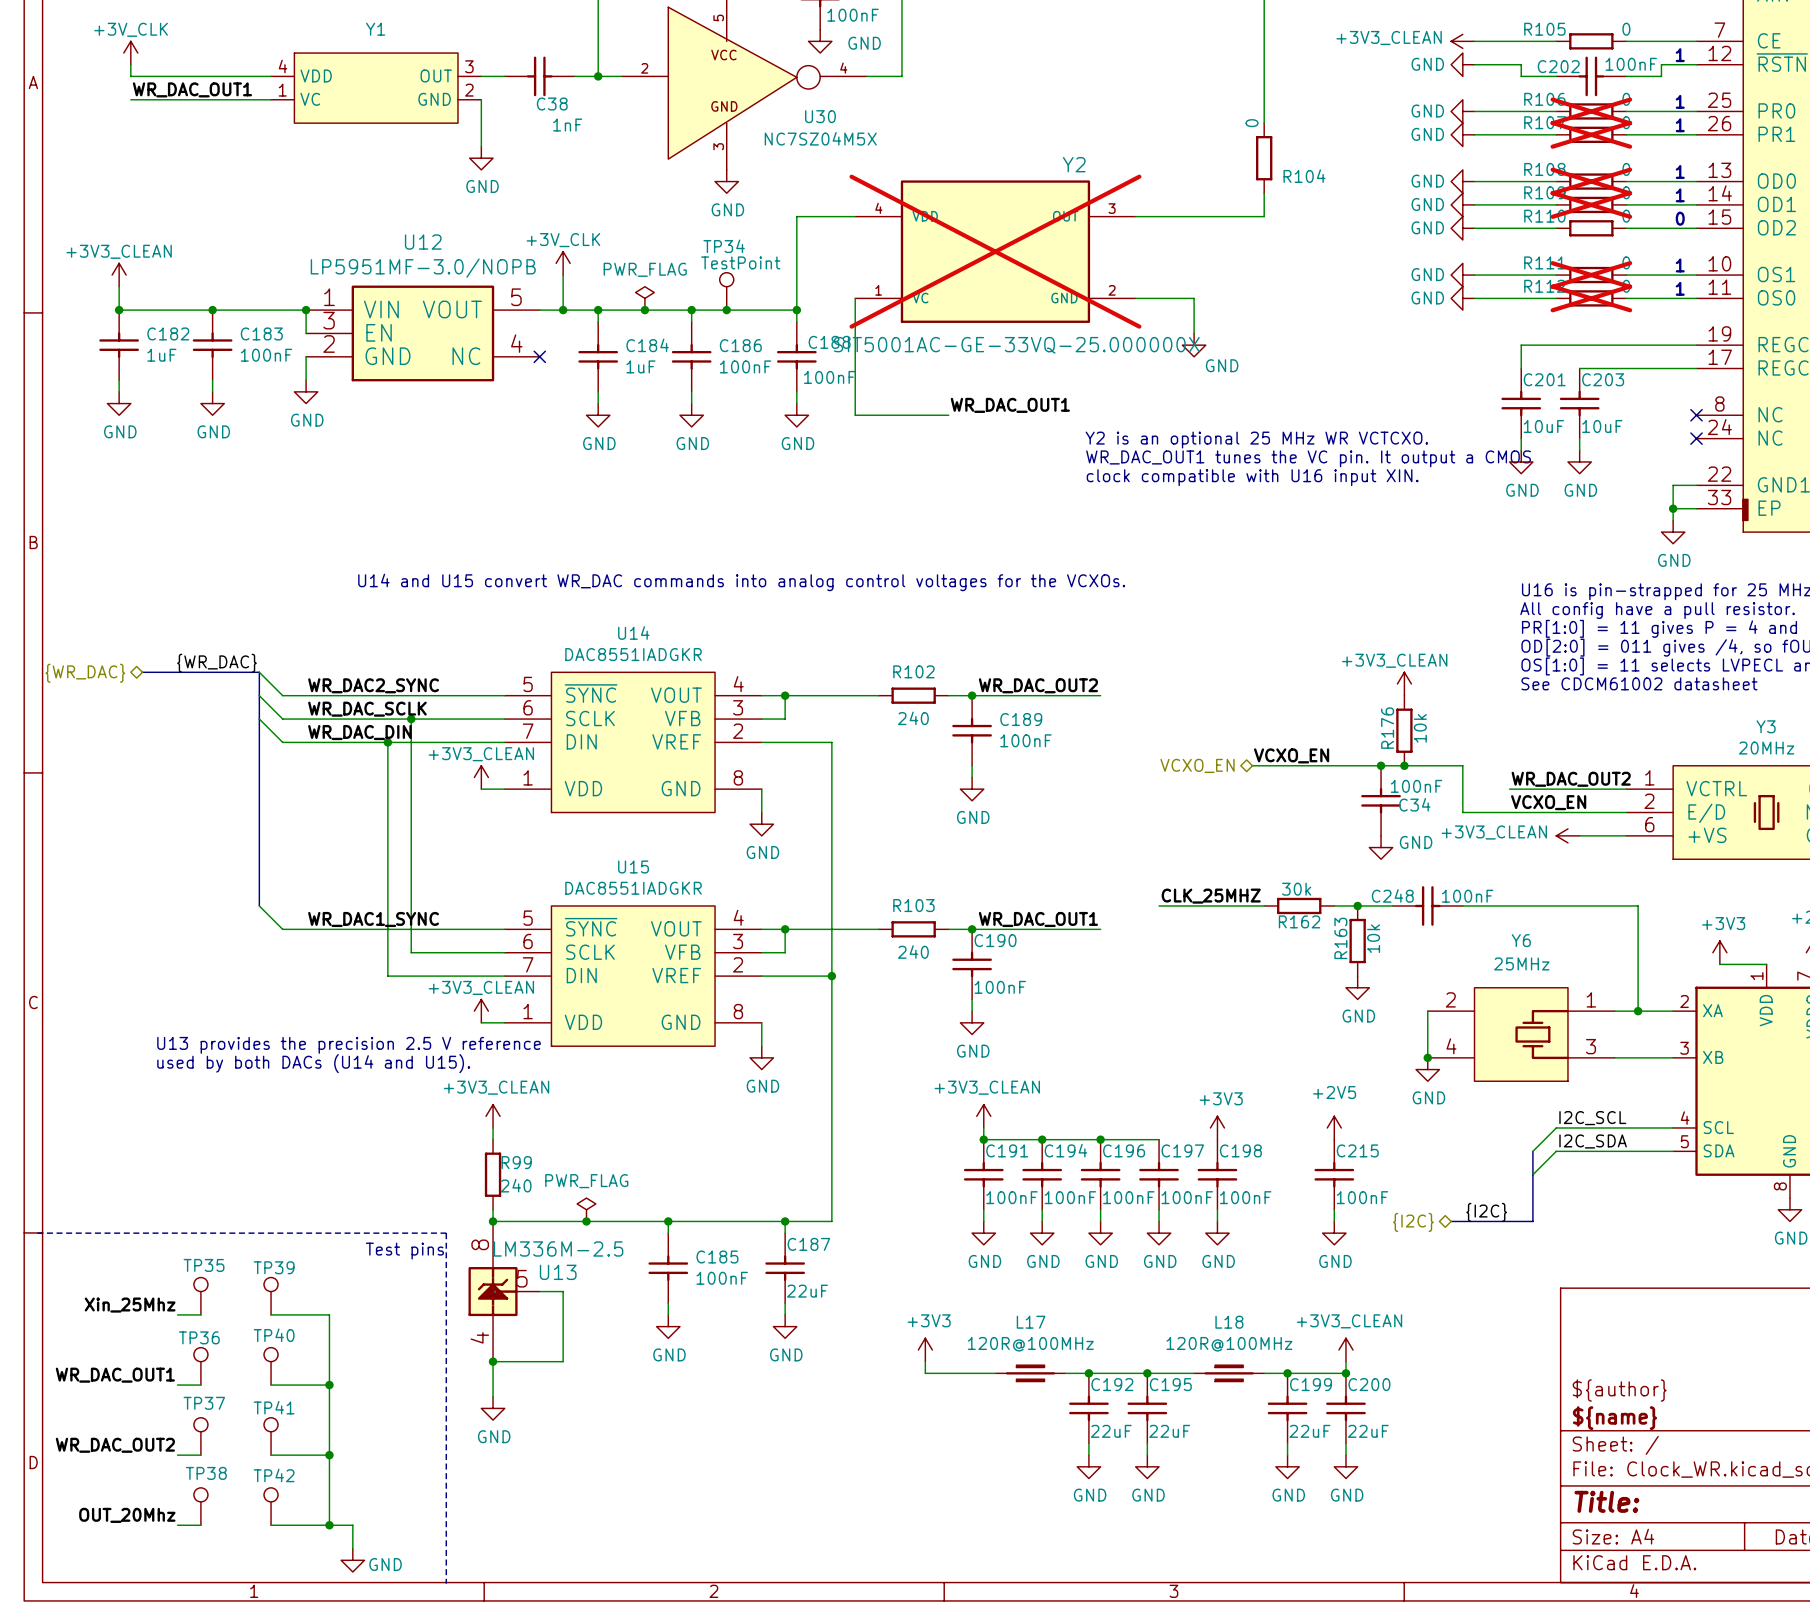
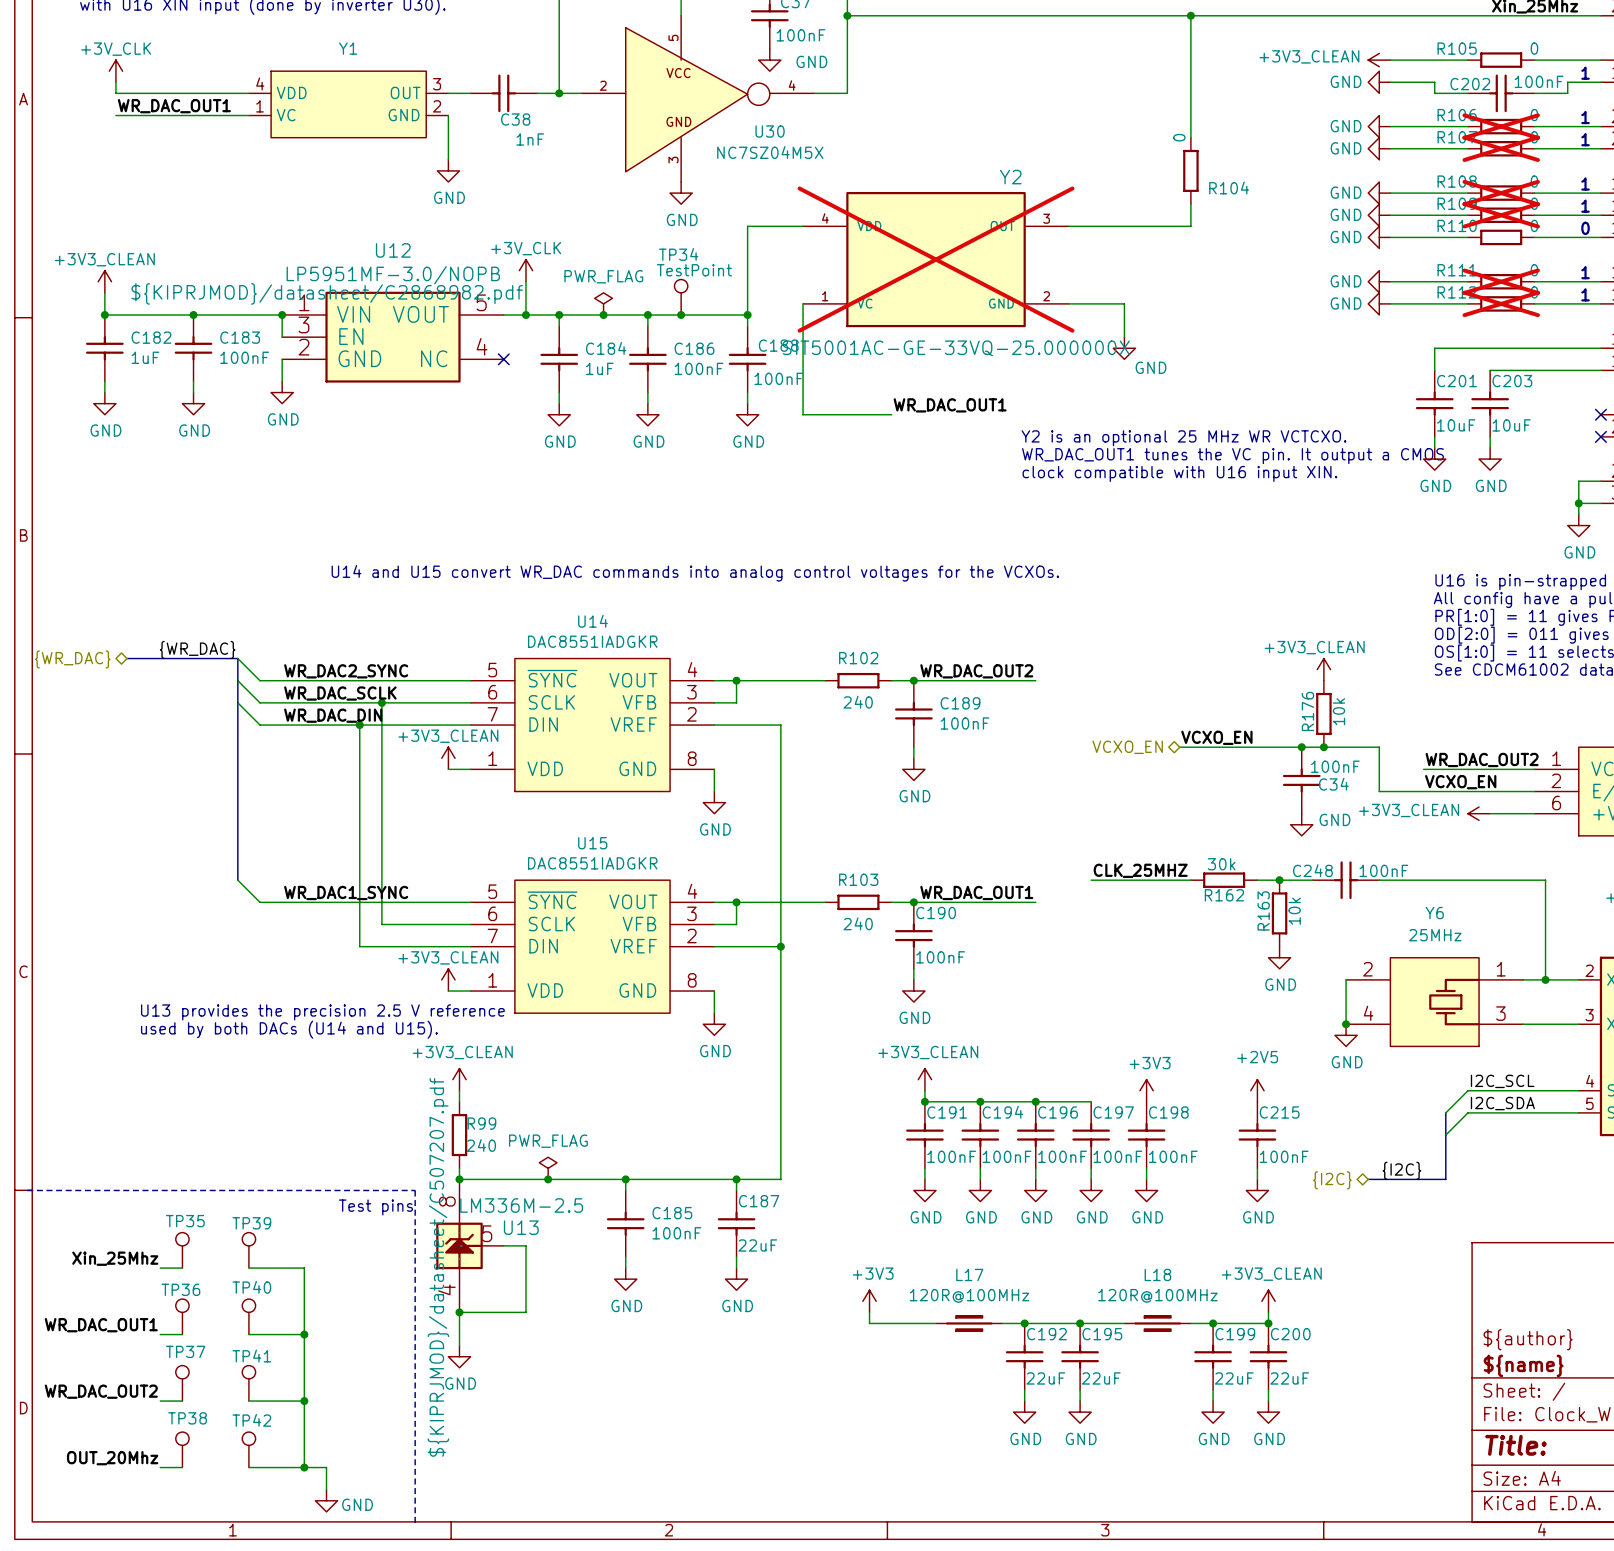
U12 text: none -> ${KIPRJMOD}/datasheet/C2868982.pdf (327, 293)
U13 text: none -> ${KIPRJMOD}/datasheet/C507207.pdf (438, 1267)

